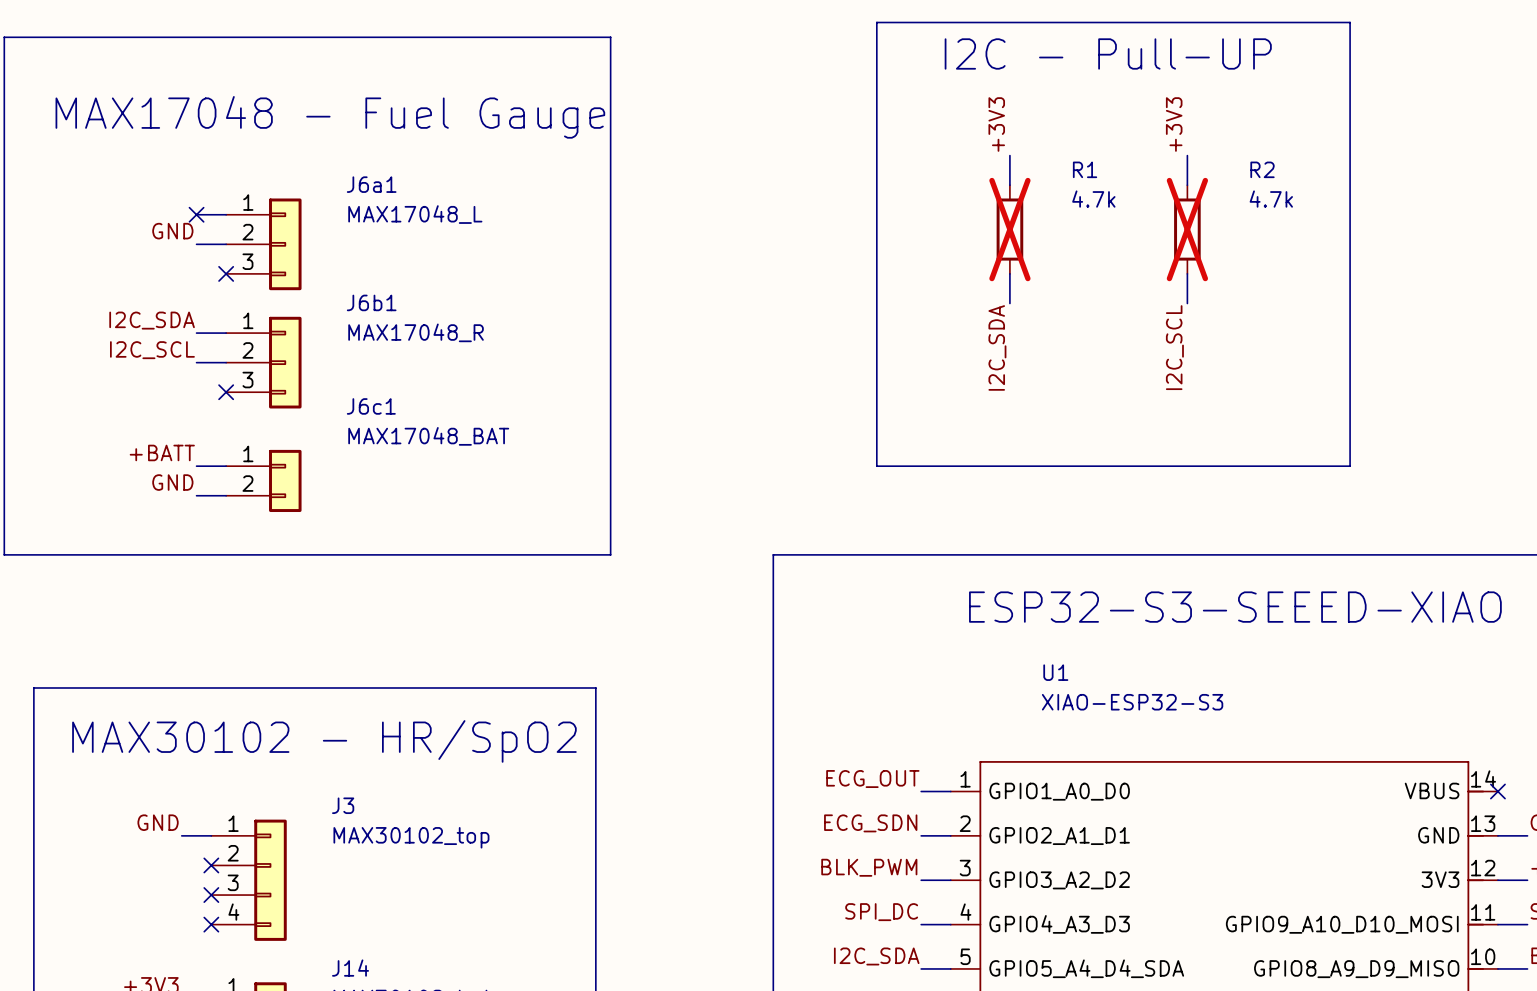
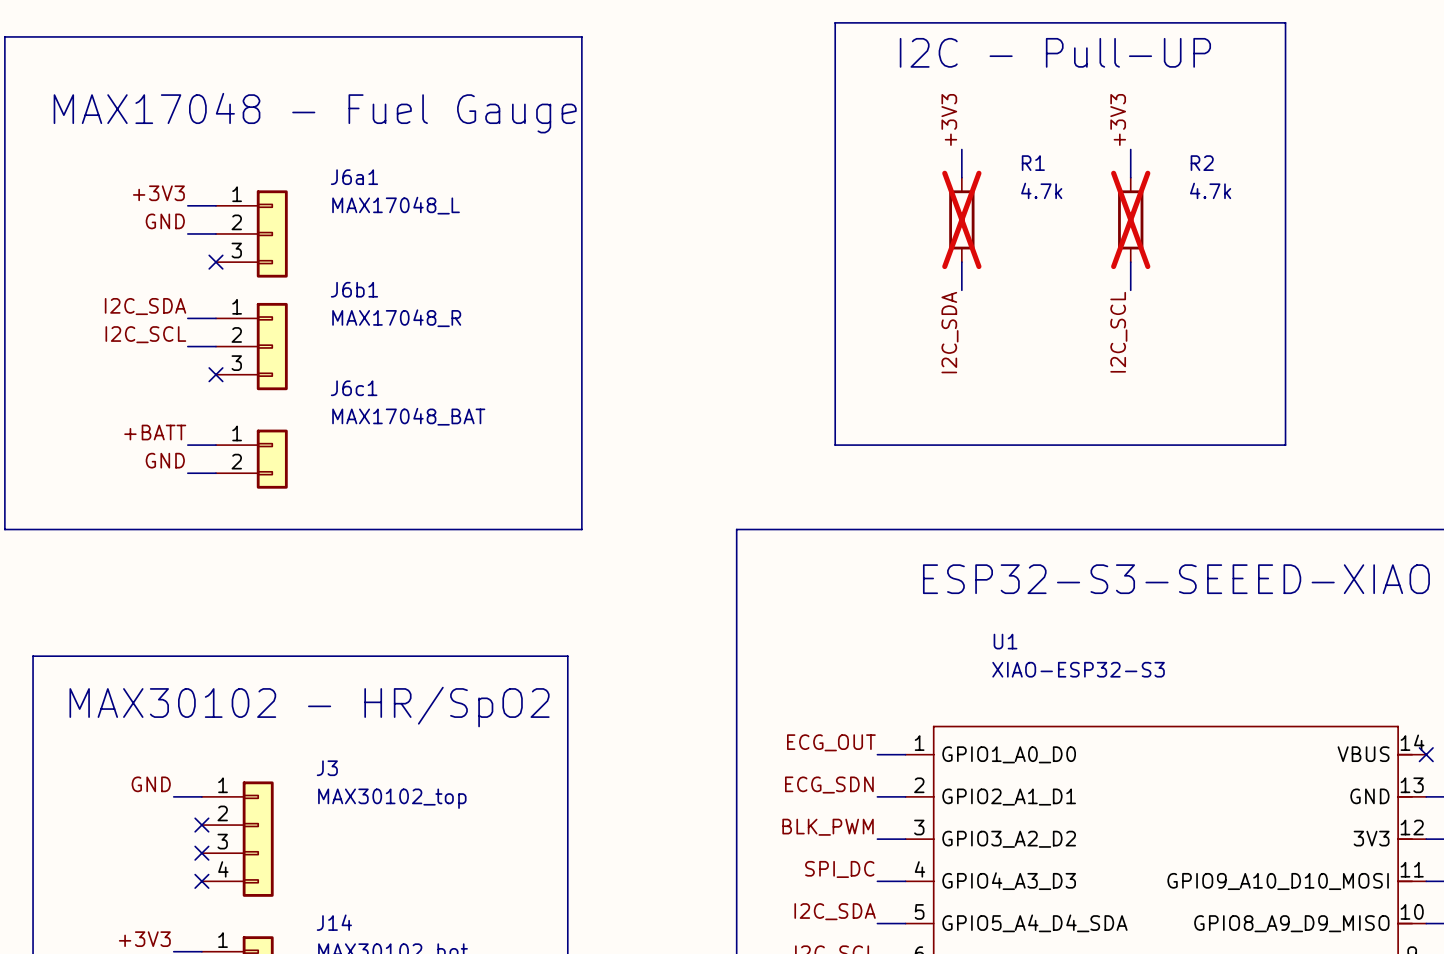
label: none -> +3V3 (158, 193)
no-connect mark: (196, 214) -> none

